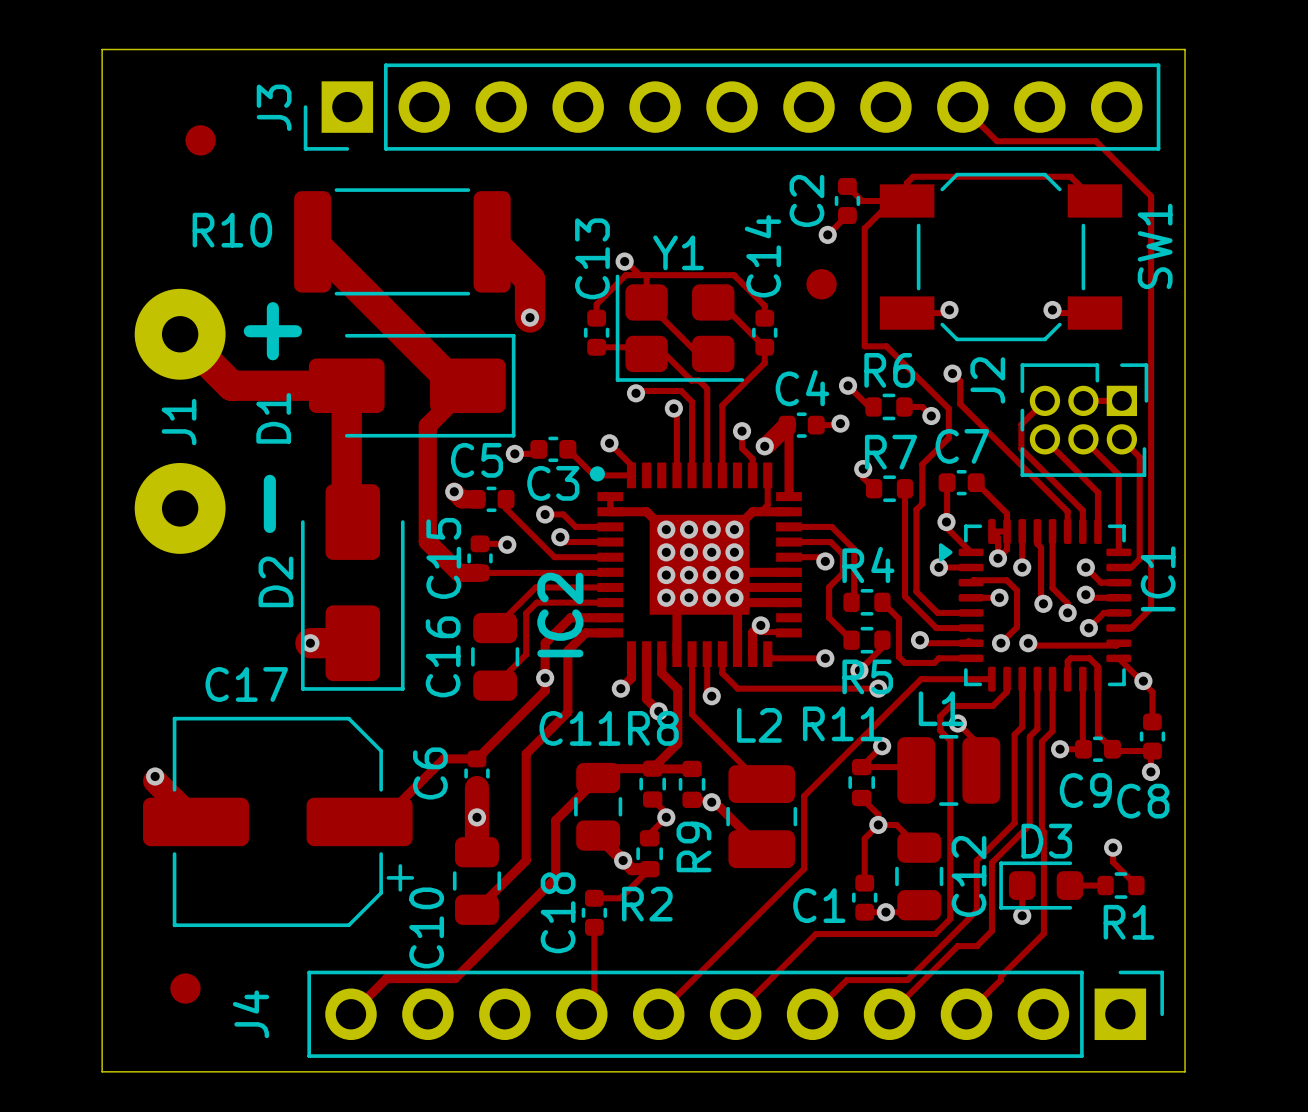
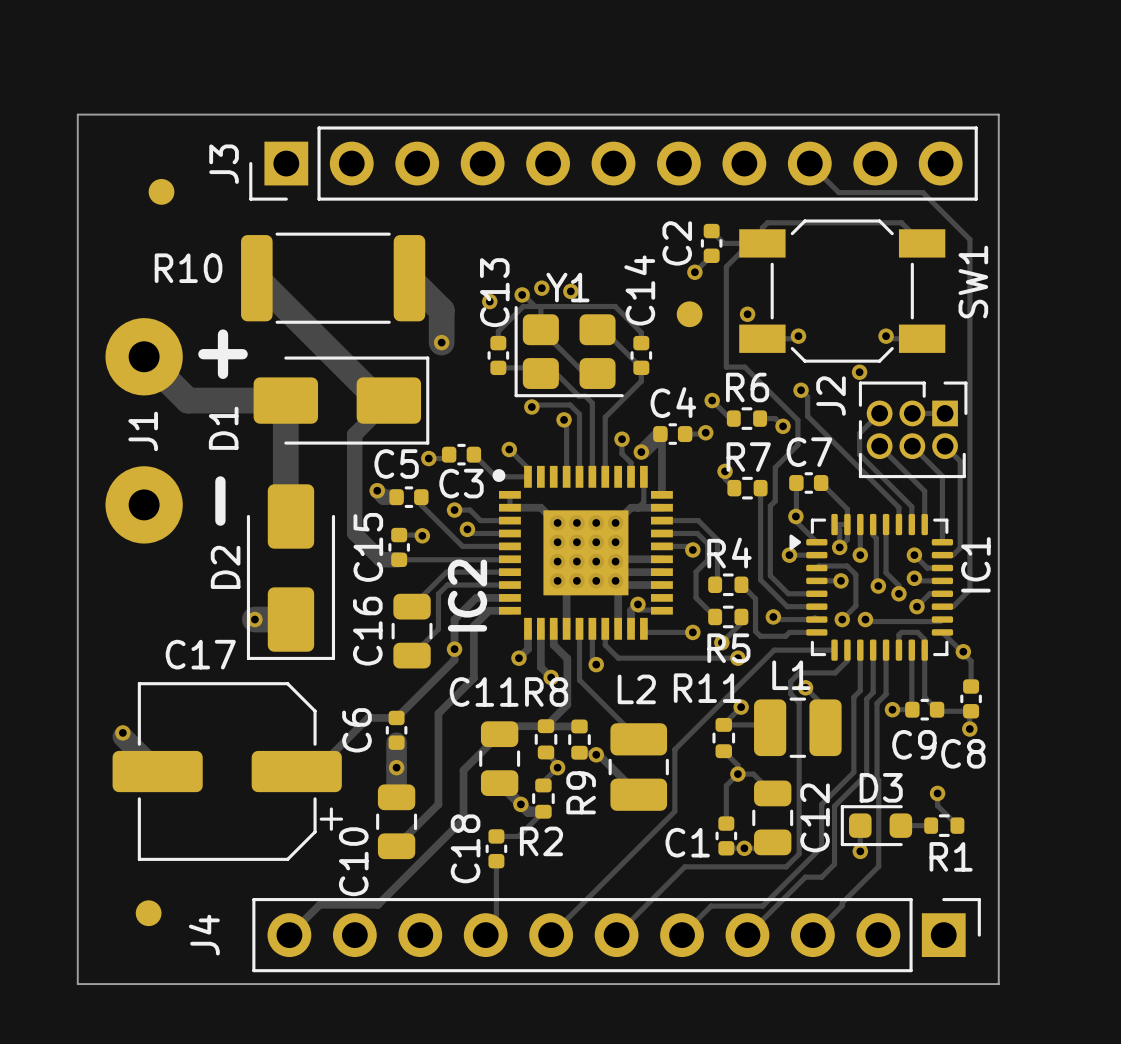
via: none -> (541, 288)
via: none -> (570, 291)
via: none -> (489, 301)
via: none -> (747, 314)
via: none -> (859, 372)

